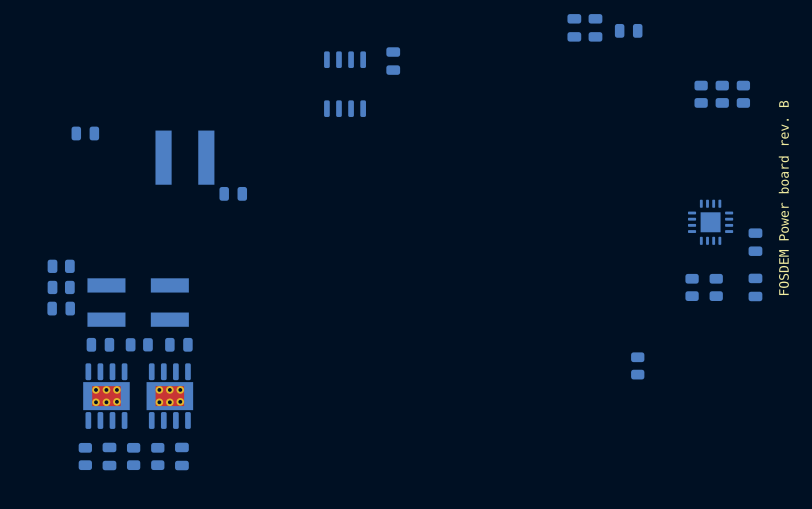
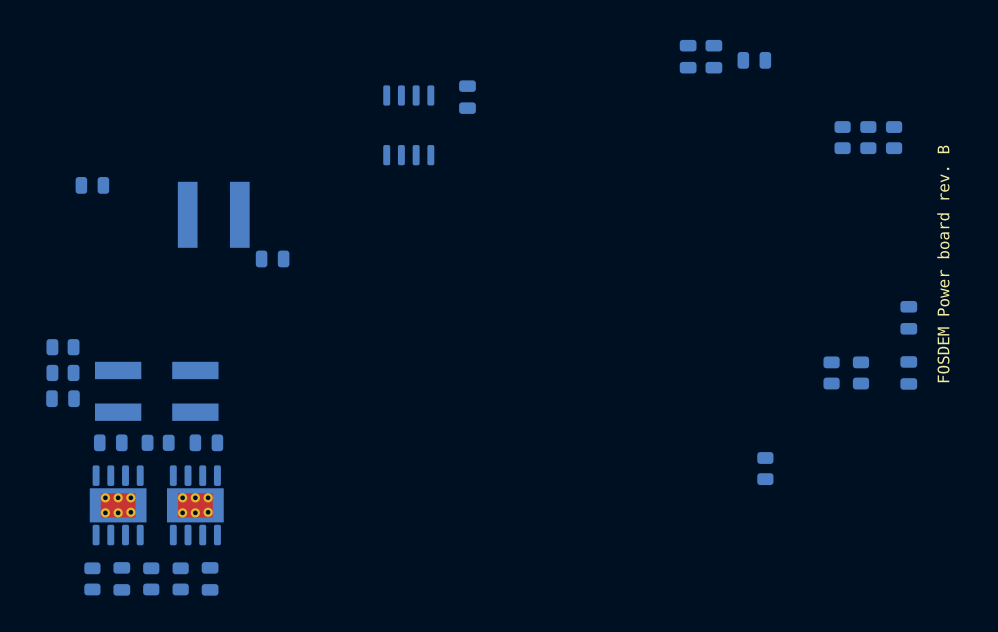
part: (710, 222) -> none

